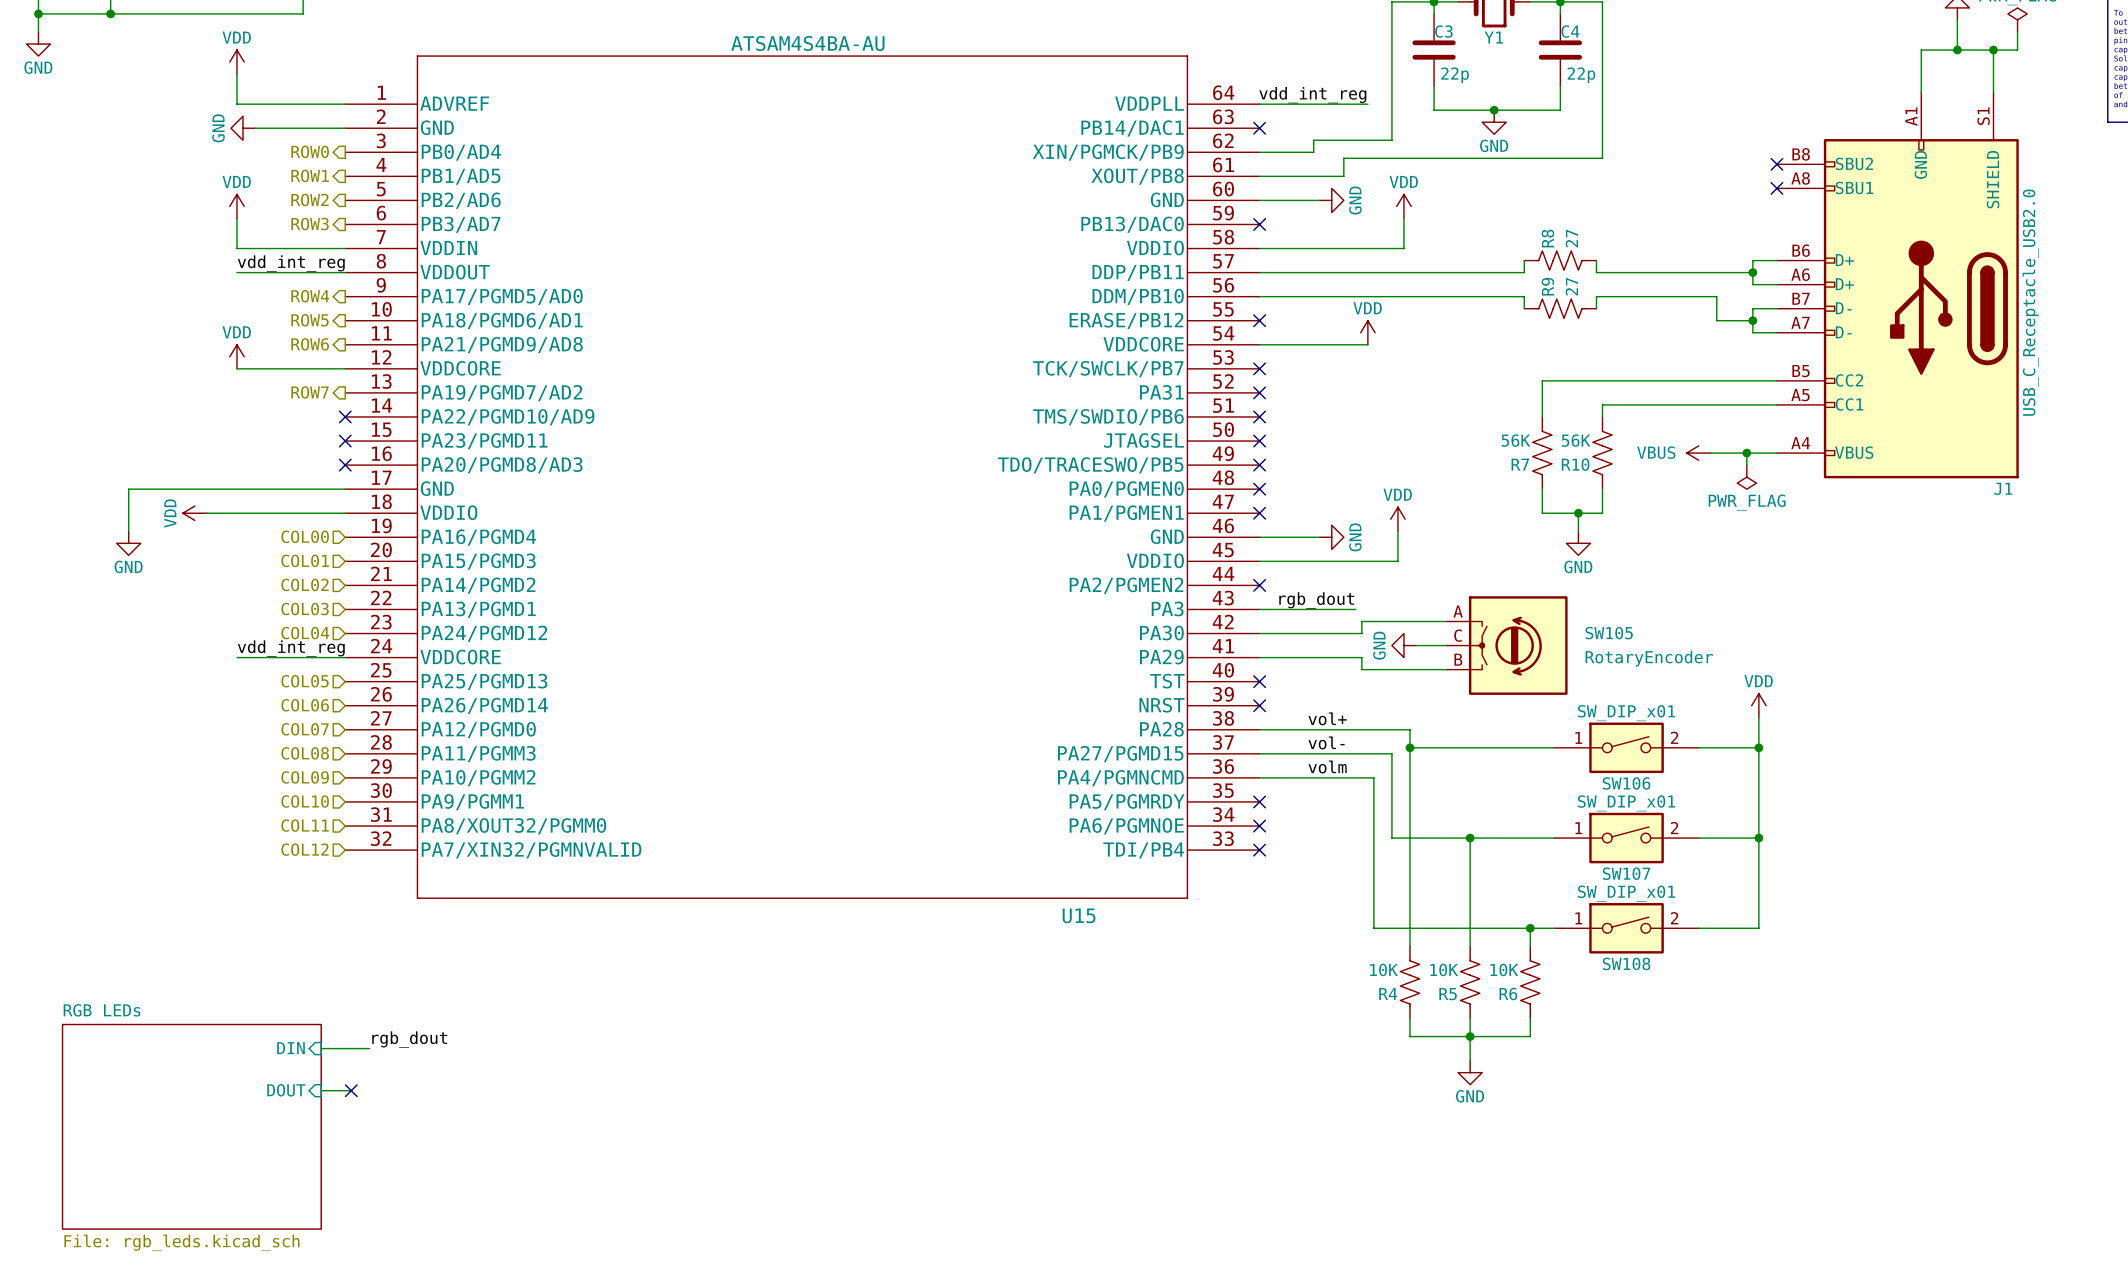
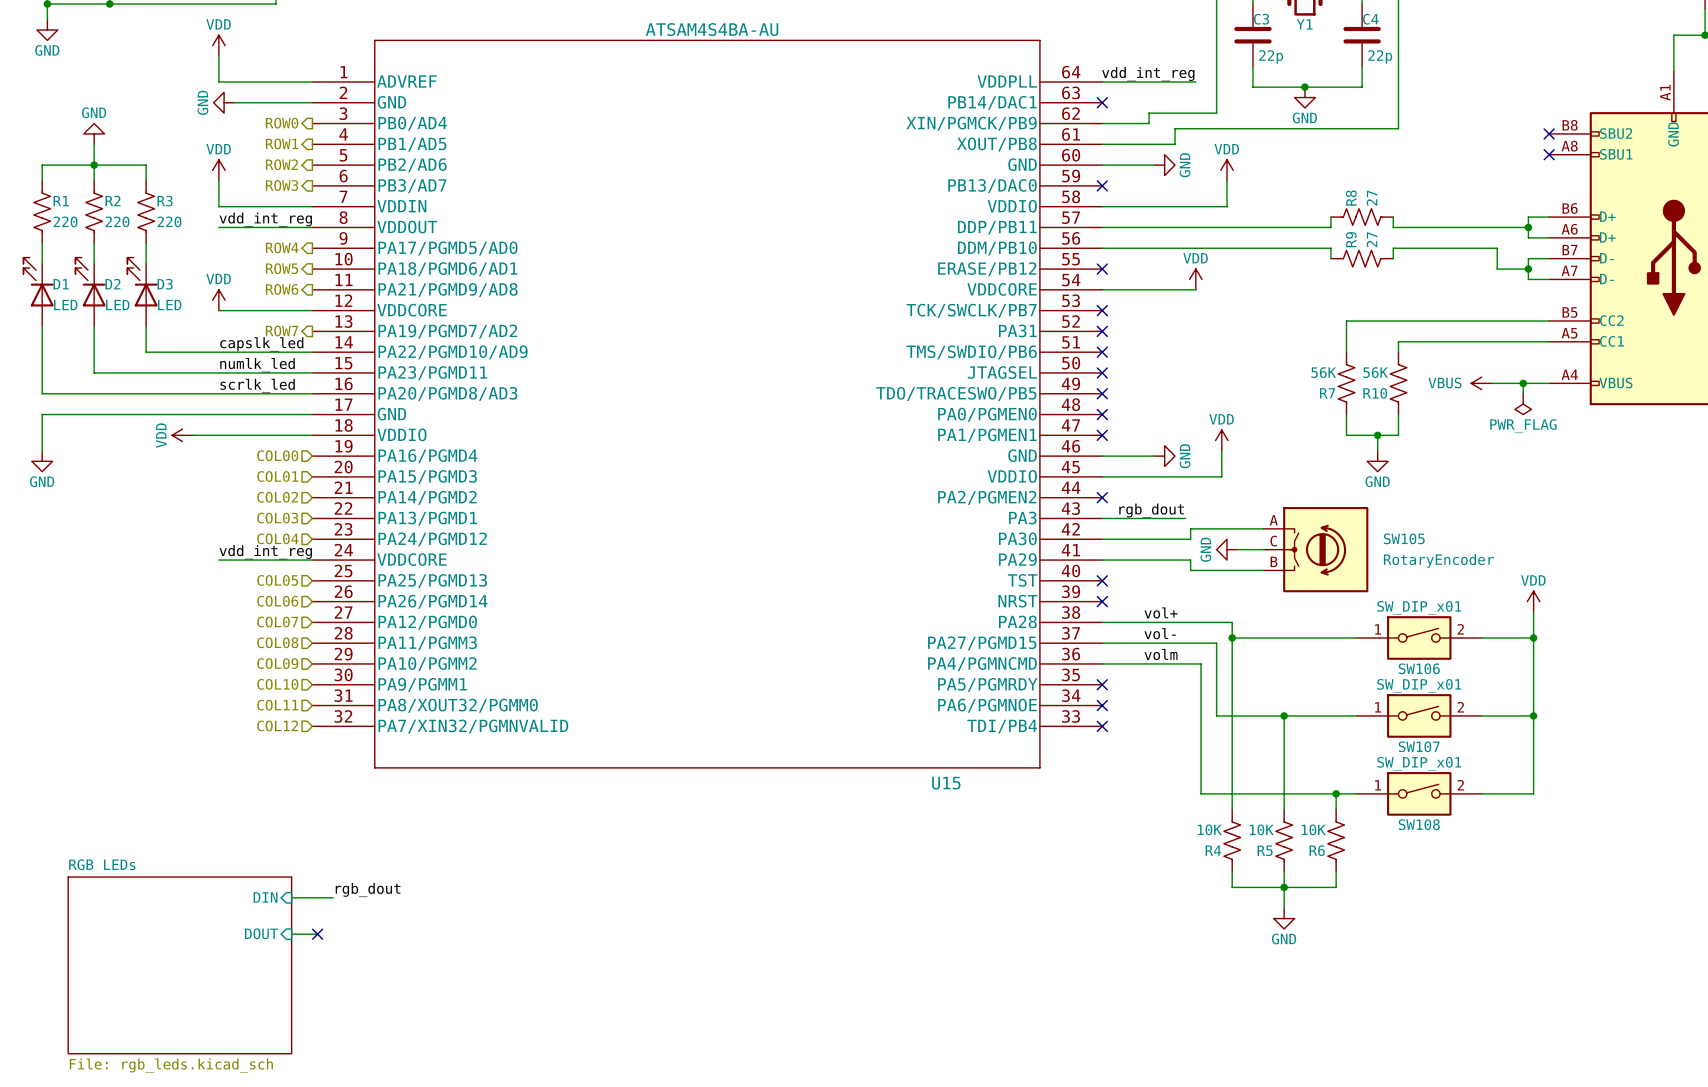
power symbol: none -> GND (94, 133)
wire: none -> (94, 144) (94, 180)
junction: none -> (94, 165)
wire: none -> (42, 180) (42, 165) (146, 165) (146, 180)
R1: none -> 220 (42, 211)
R2: none -> 220 (94, 211)
R3: none -> 220 (146, 211)
wire: none -> (42, 243) (42, 263)
wire: none -> (94, 243) (94, 263)
wire: none -> (146, 243) (146, 263)
D1: none -> LED (38, 291)
D2: none -> LED (90, 291)
D3: none -> LED (142, 291)
wire: none -> (42, 326) (42, 393) (312, 393)
wire: none -> (94, 326) (94, 372) (312, 372)
wire: none -> (146, 326) (146, 352) (312, 352)
label: none -> capslk_led (261, 344)
no-connect mark: (345, 416) -> none
label: none -> numlk_led (257, 365)
no-connect mark: (345, 441) -> none
label: none -> scrlk_led (257, 385)
no-connect mark: (345, 465) -> none
wire: (128, 489) (128, 531) -> (125, 414) (42, 414) (42, 450)
power symbol position: GND (128, 543) -> GND (42, 461)

